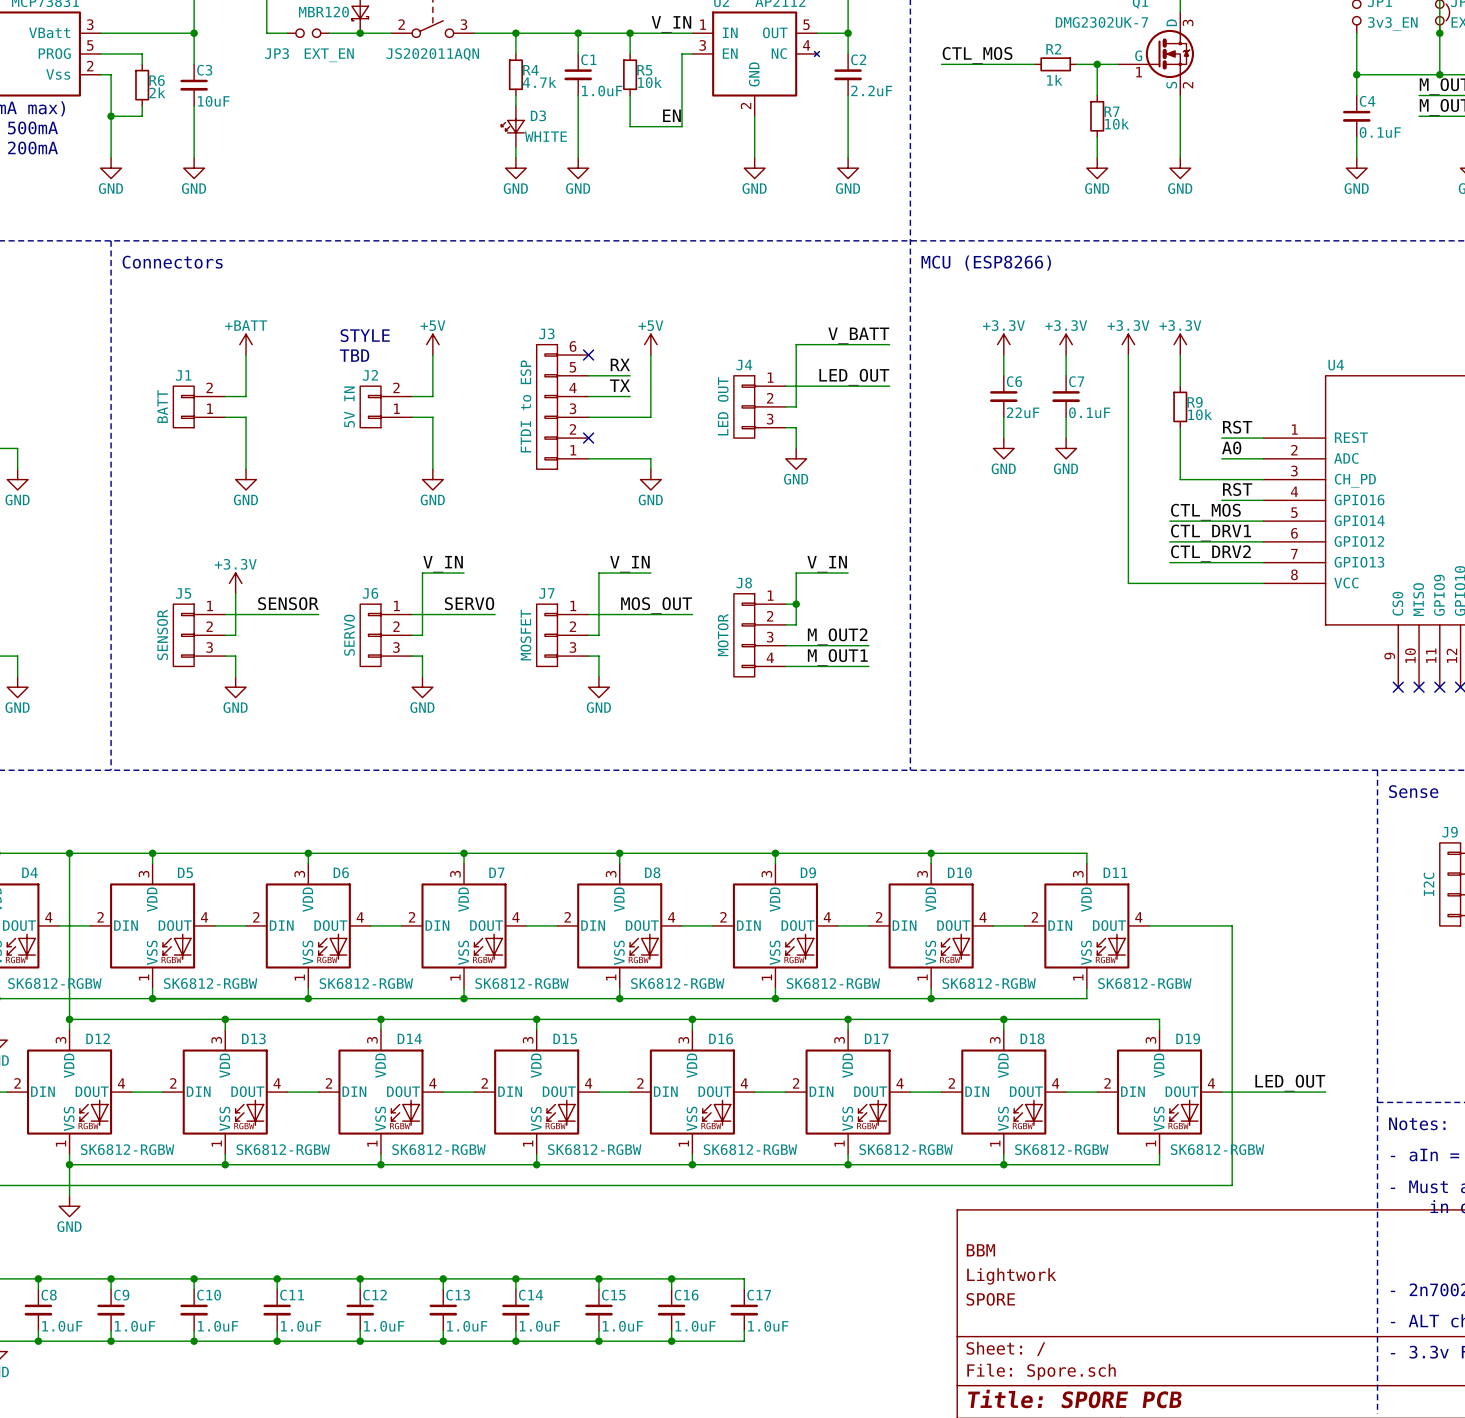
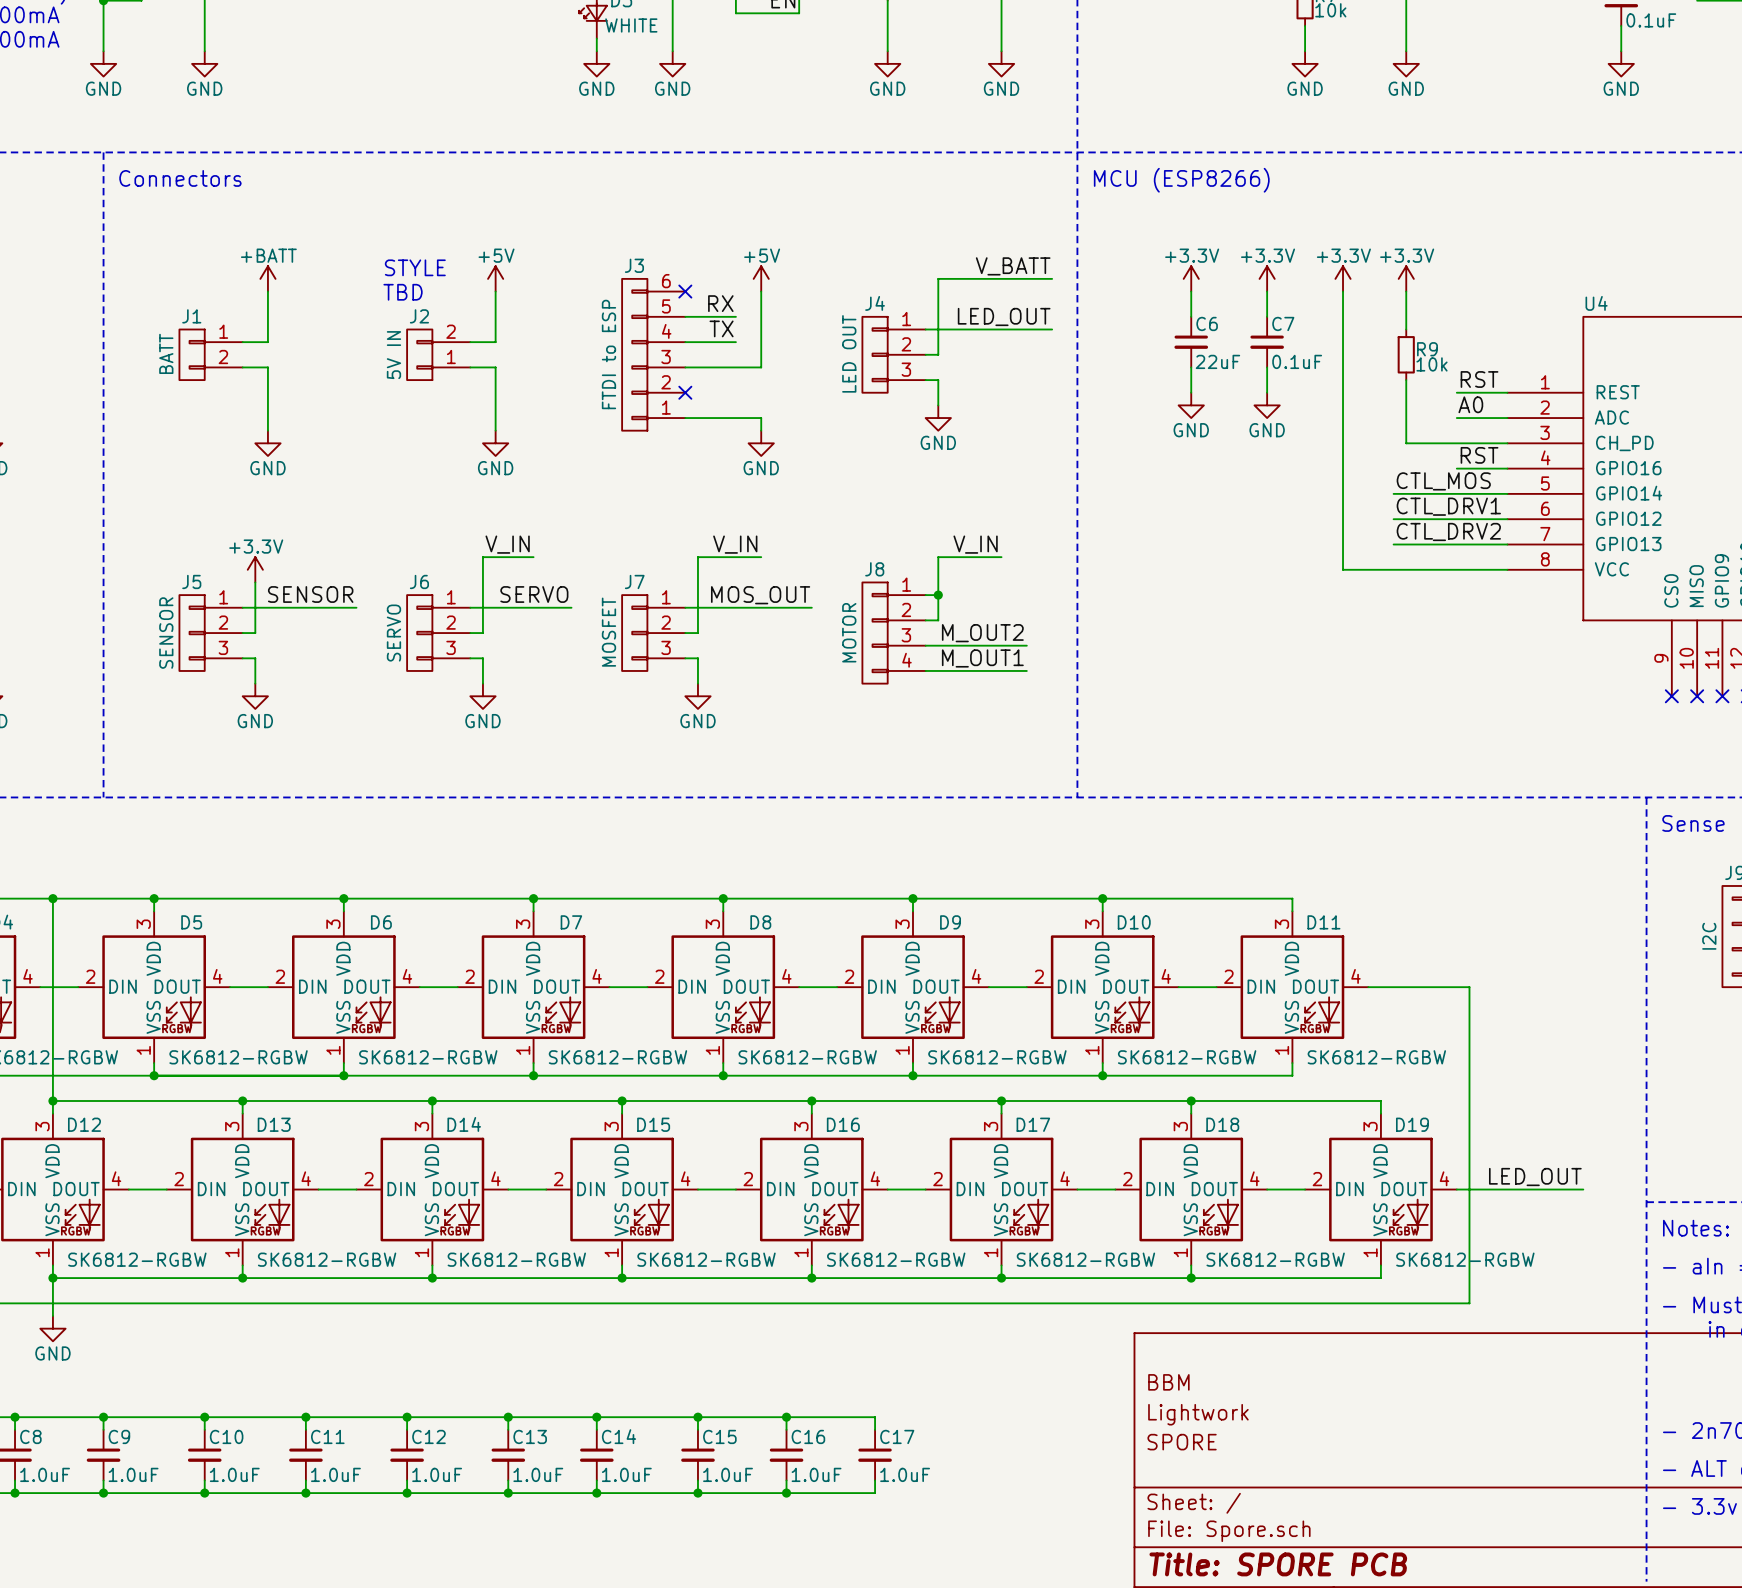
J1 flip: as is (183, 406) -> up-down (192, 354)

